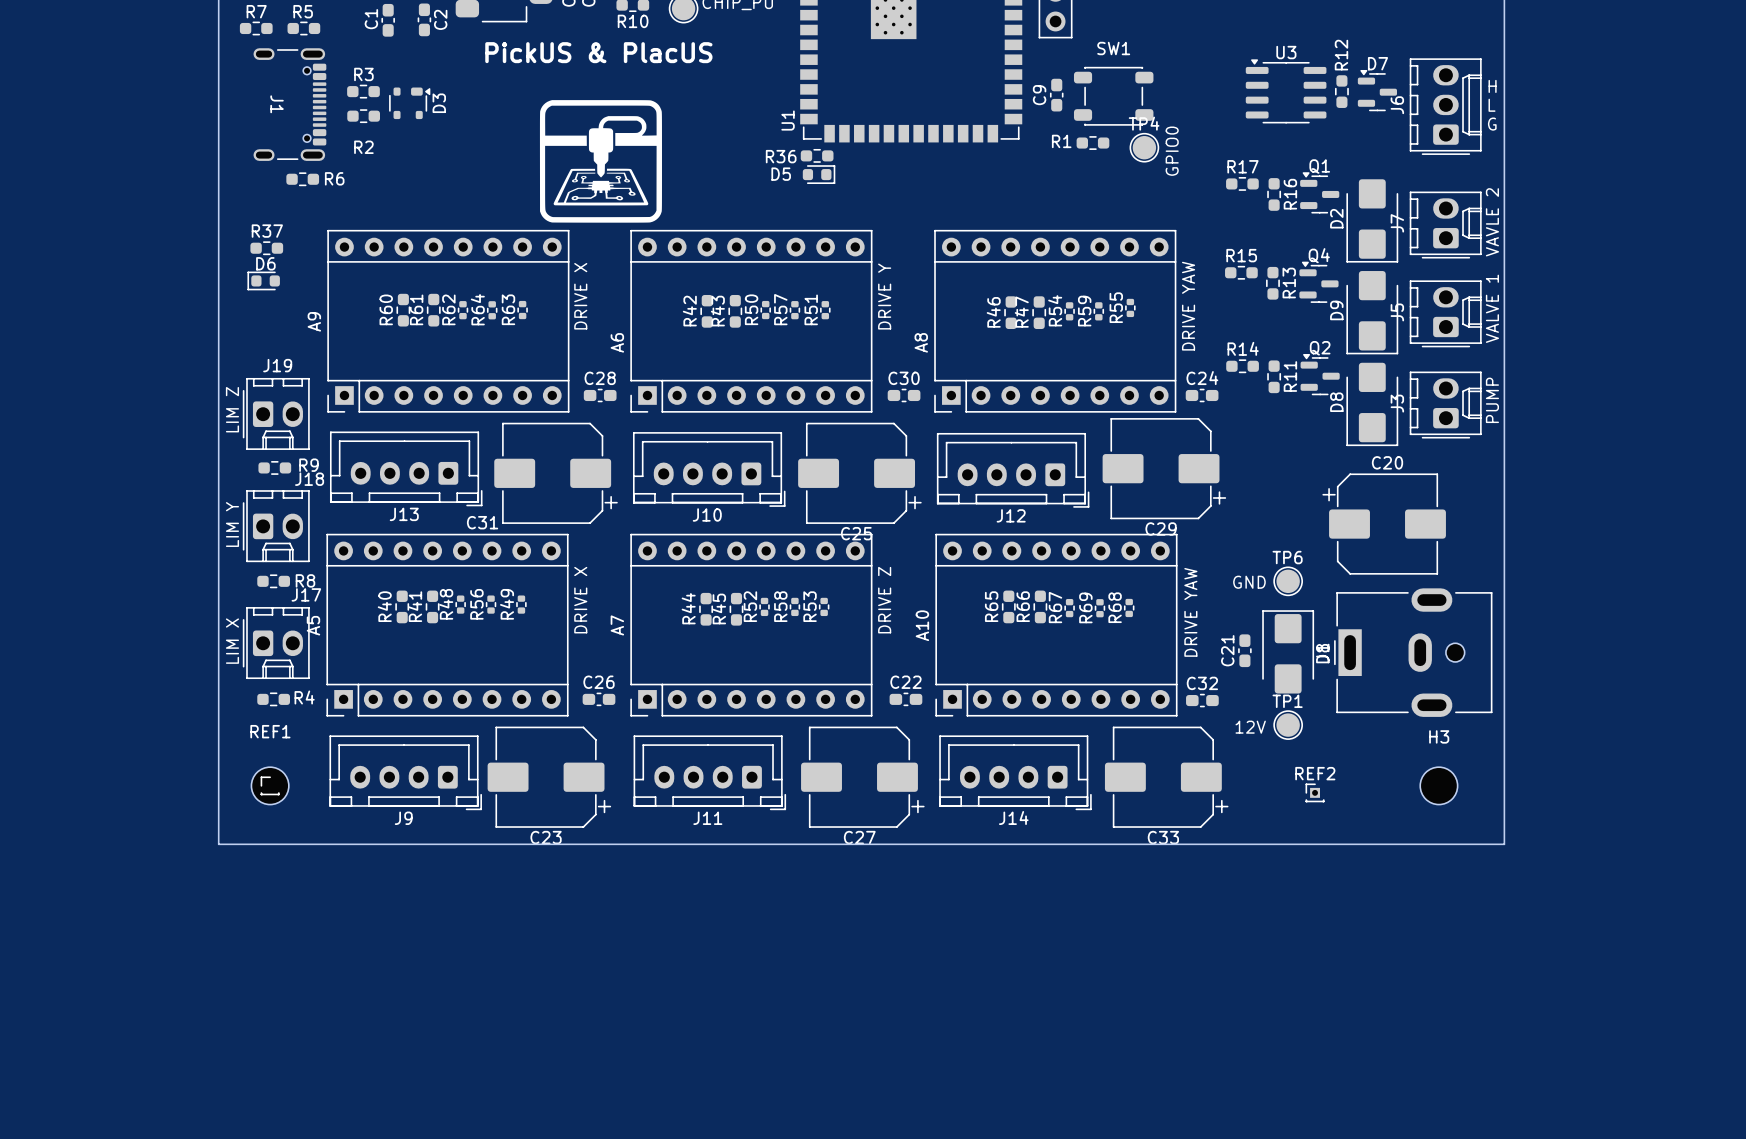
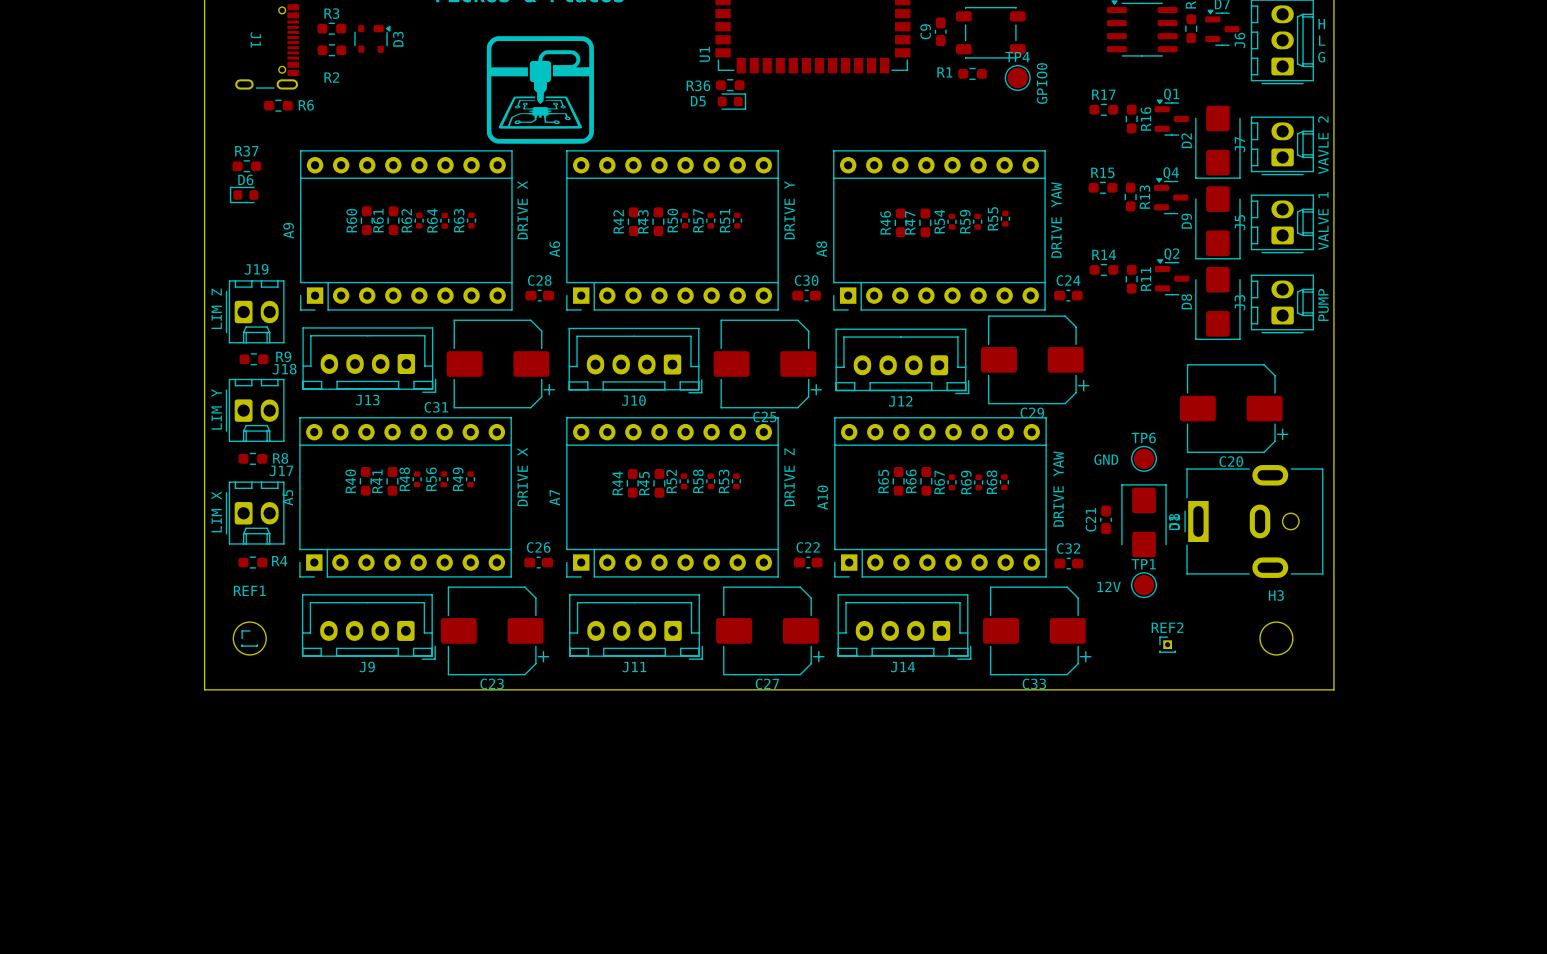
C20 rotation: 0° (1384, 524) -> 180° (1234, 408)

